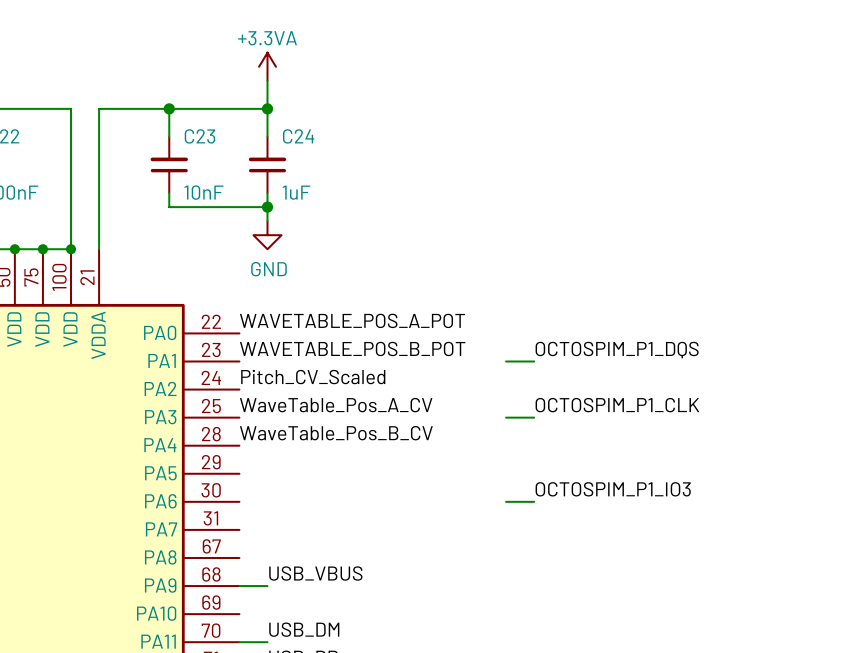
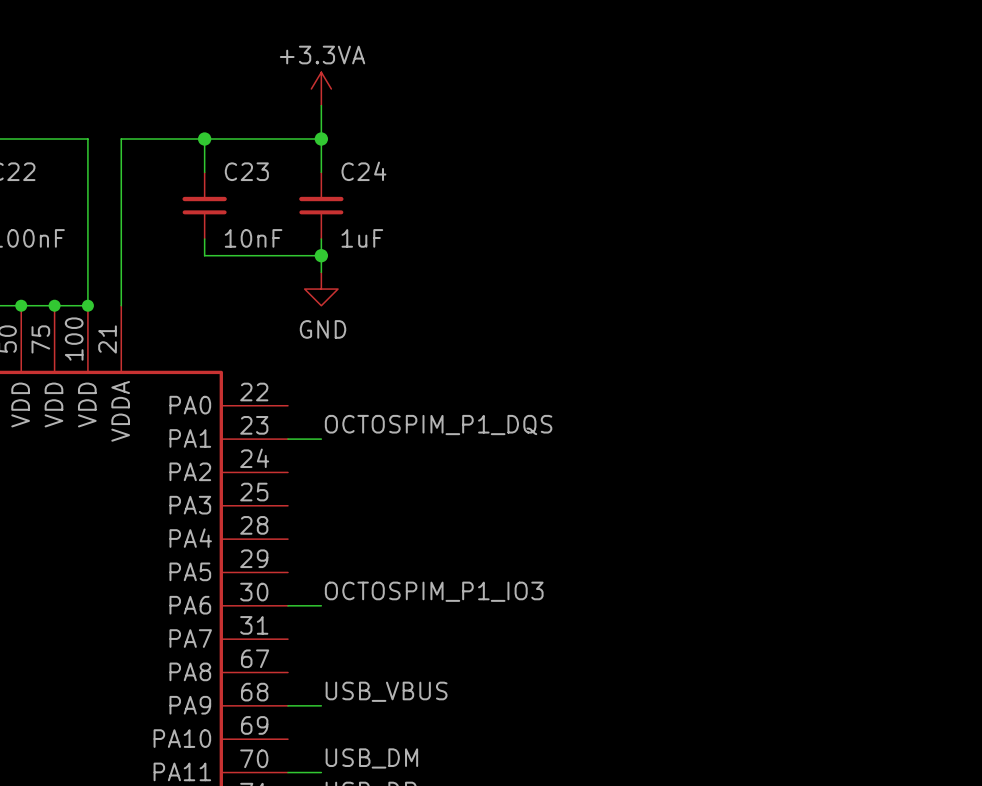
label: WAVETABLE_POS_A_POT (352, 320) -> none
label: WAVETABLE_POS_B_POT (352, 348) -> none
label position: OCTOSPIM_P1_DQS (617, 350) -> OCTOSPIM_P1_DQS (438, 425)
wire: (506, 361) (534, 361) -> (288, 439) (321, 439)
label: Pitch_CV_Scaled (313, 377) -> none
label: WaveTable_Pos_A_CV (336, 405) -> none
label: OCTOSPIM_P1_CLK (617, 405) -> none
wire: (506, 417) (534, 417) -> none
label: WaveTable_Pos_B_CV (336, 433) -> none
label position: OCTOSPIM_P1_IO3 (613, 489) -> OCTOSPIM_P1_IO3 (434, 591)
wire: (506, 501) (534, 501) -> (288, 605) (321, 605)

